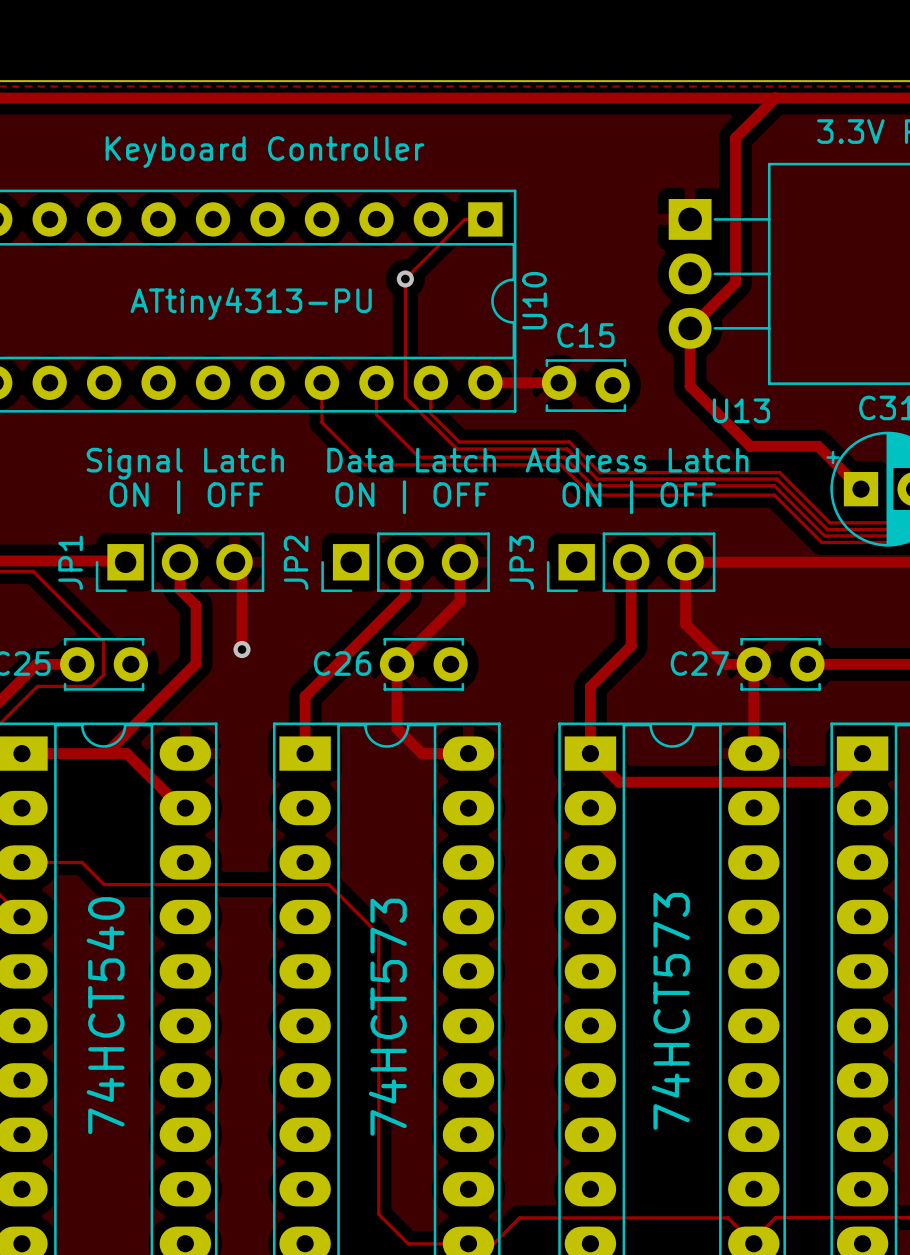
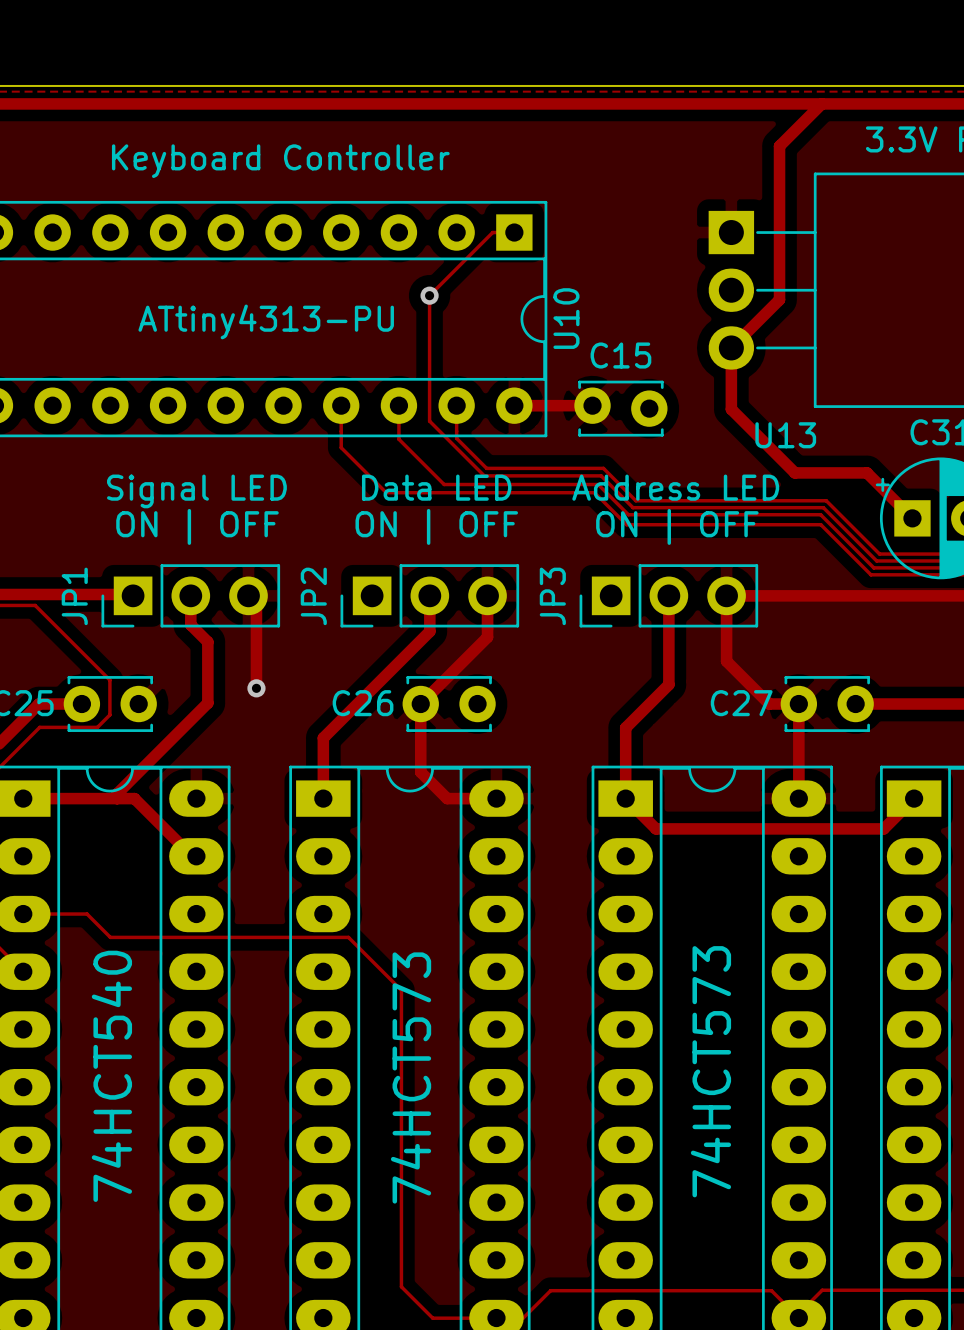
text: Data Latch (411, 460) -> Data LED (436, 487)
text: Address Latch (637, 460) -> Address LED (675, 487)
text: Signal Latch (185, 463) -> Signal LED (196, 491)

